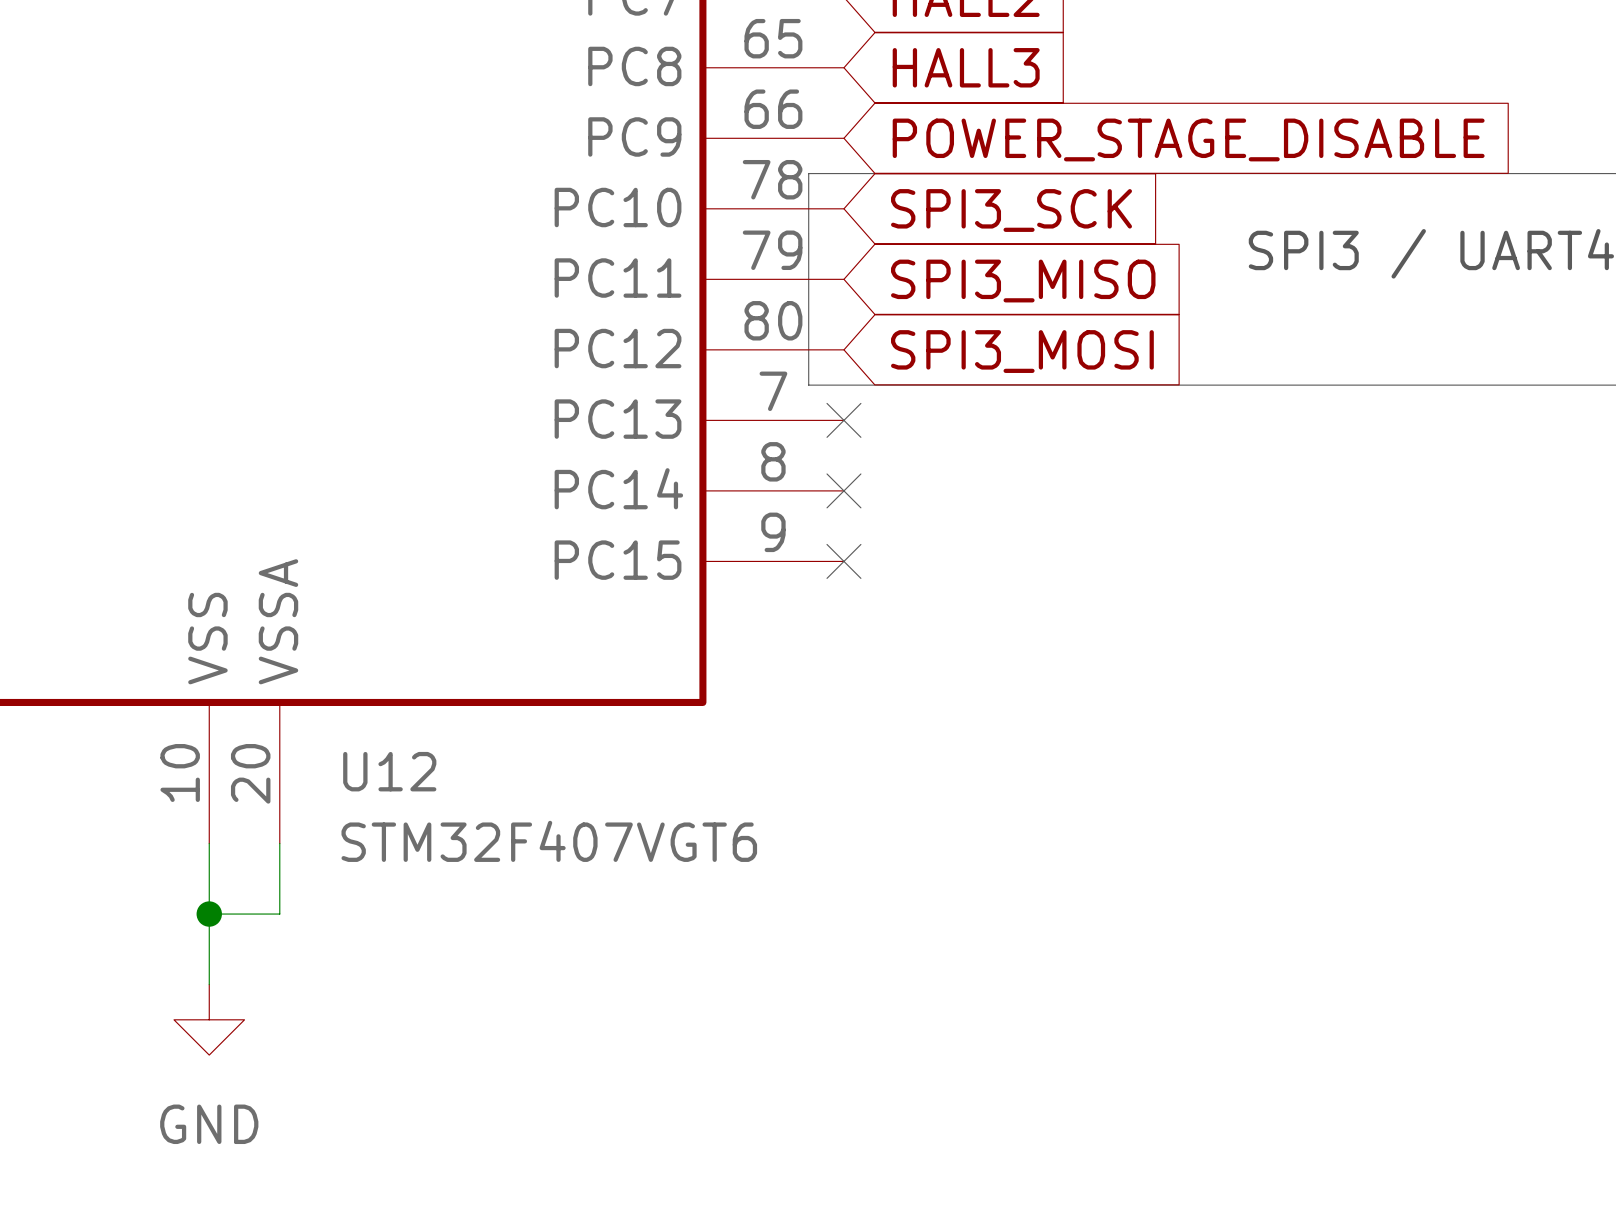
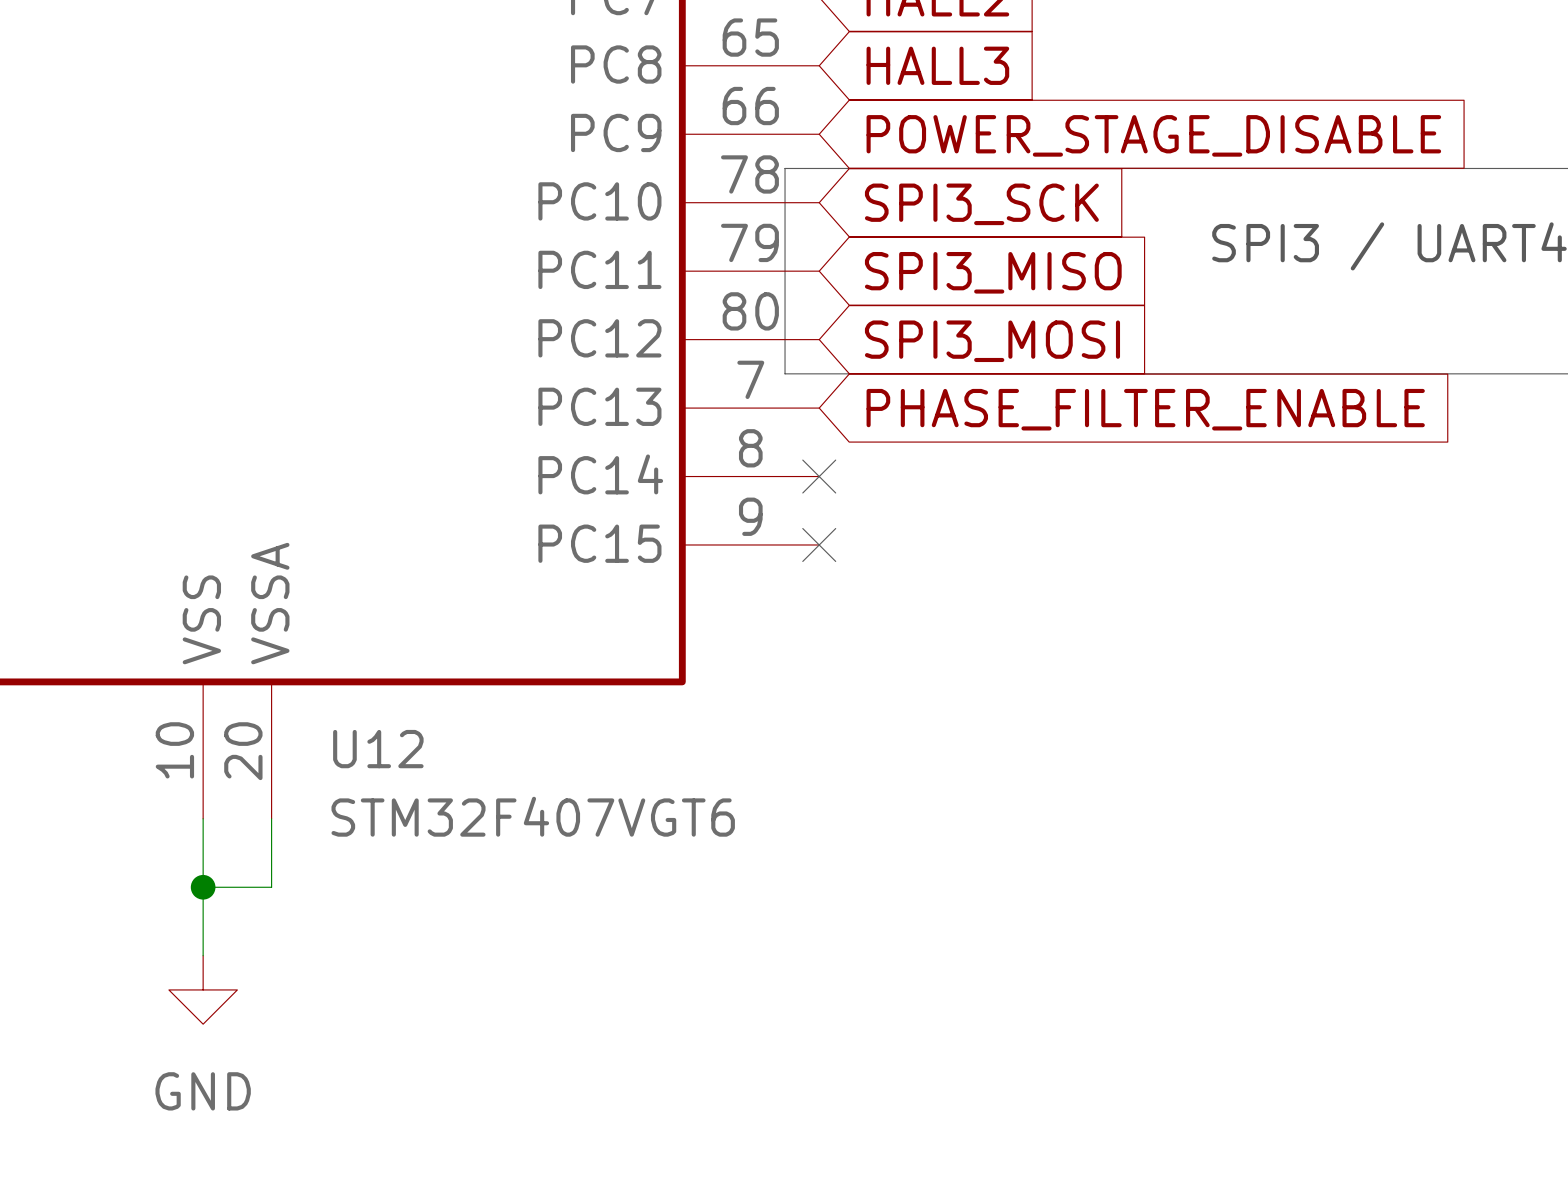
no-connect mark: (843, 420) -> none
global label: none -> PHASE_FILTER_ENABLE (1145, 409)

